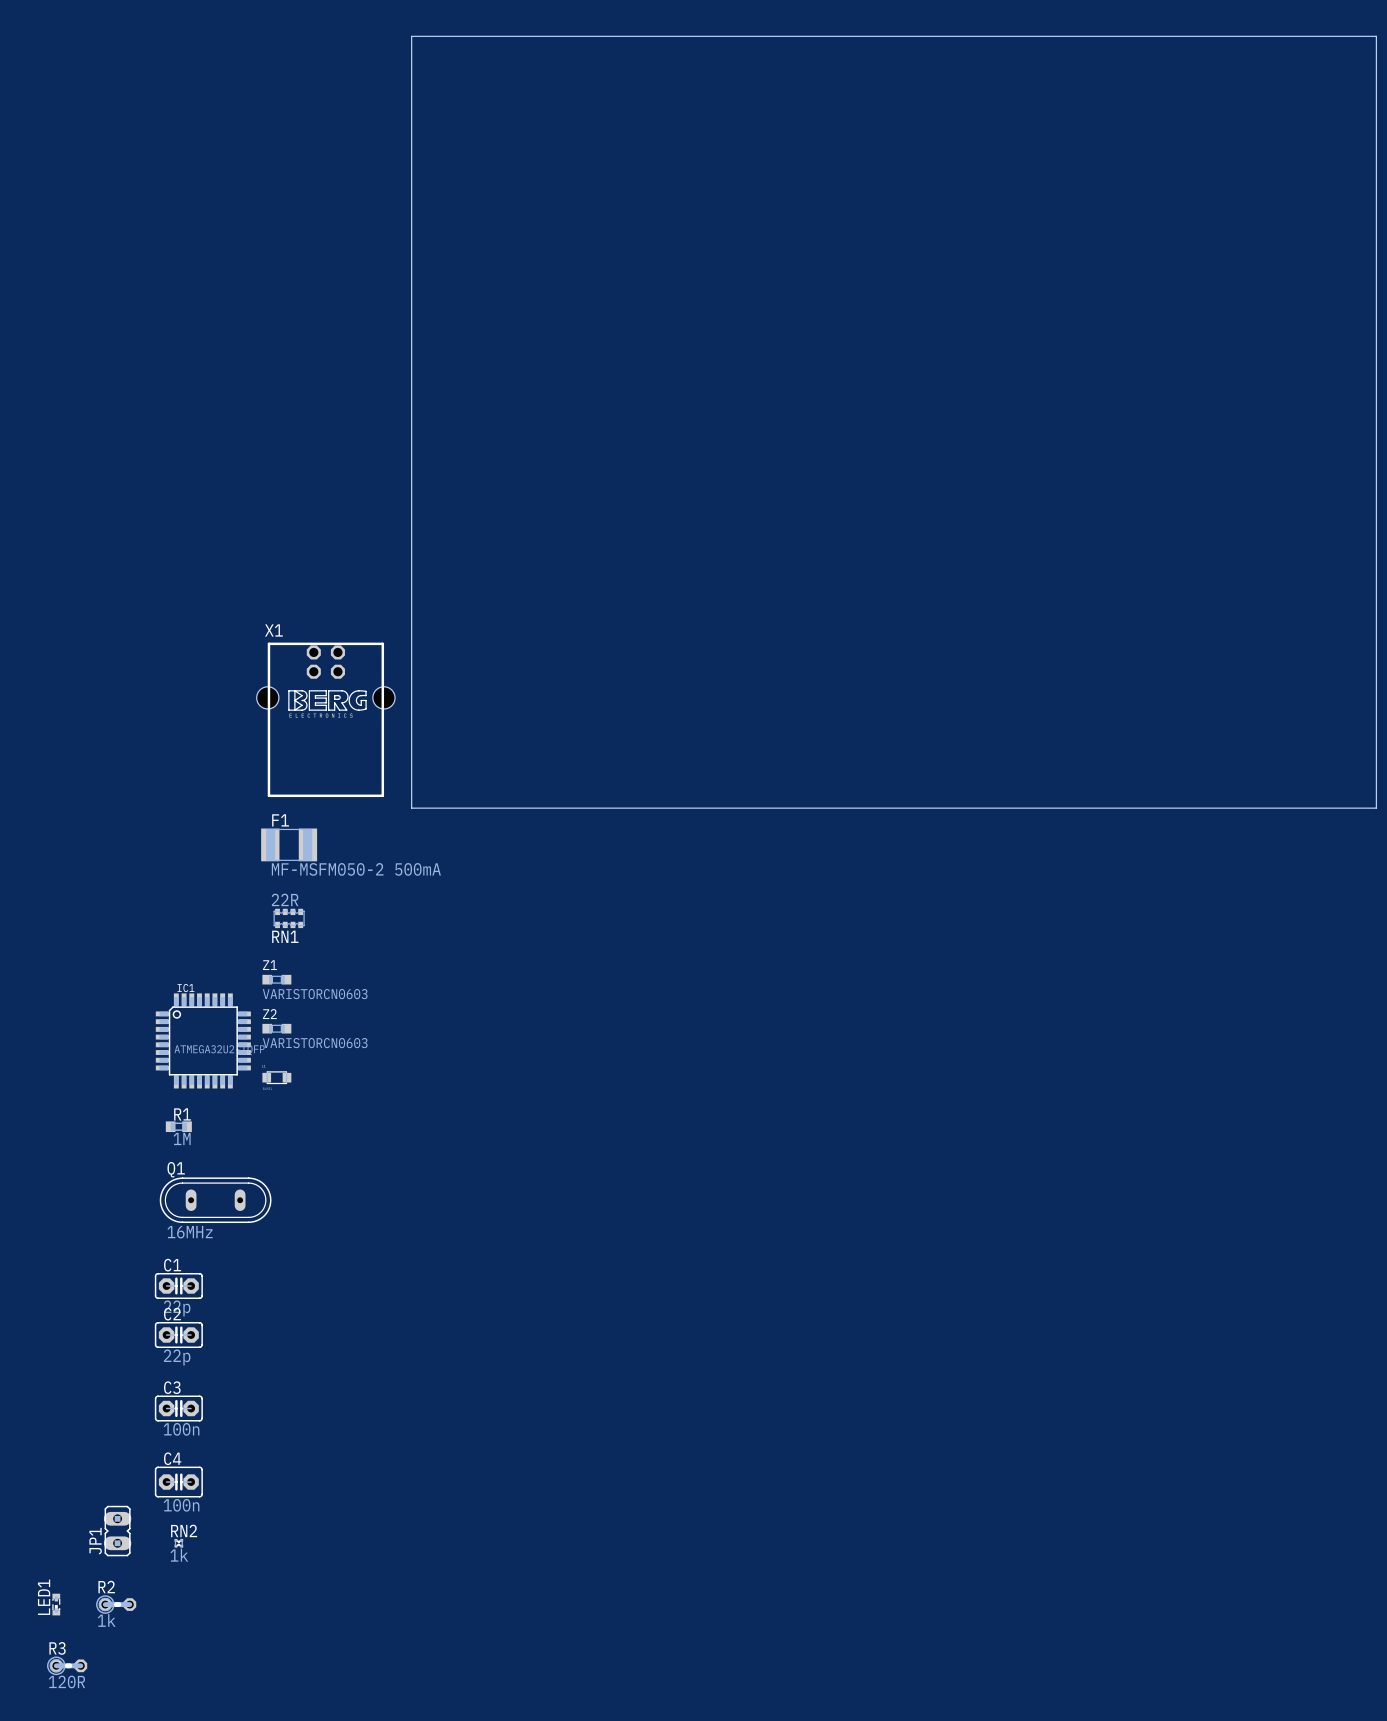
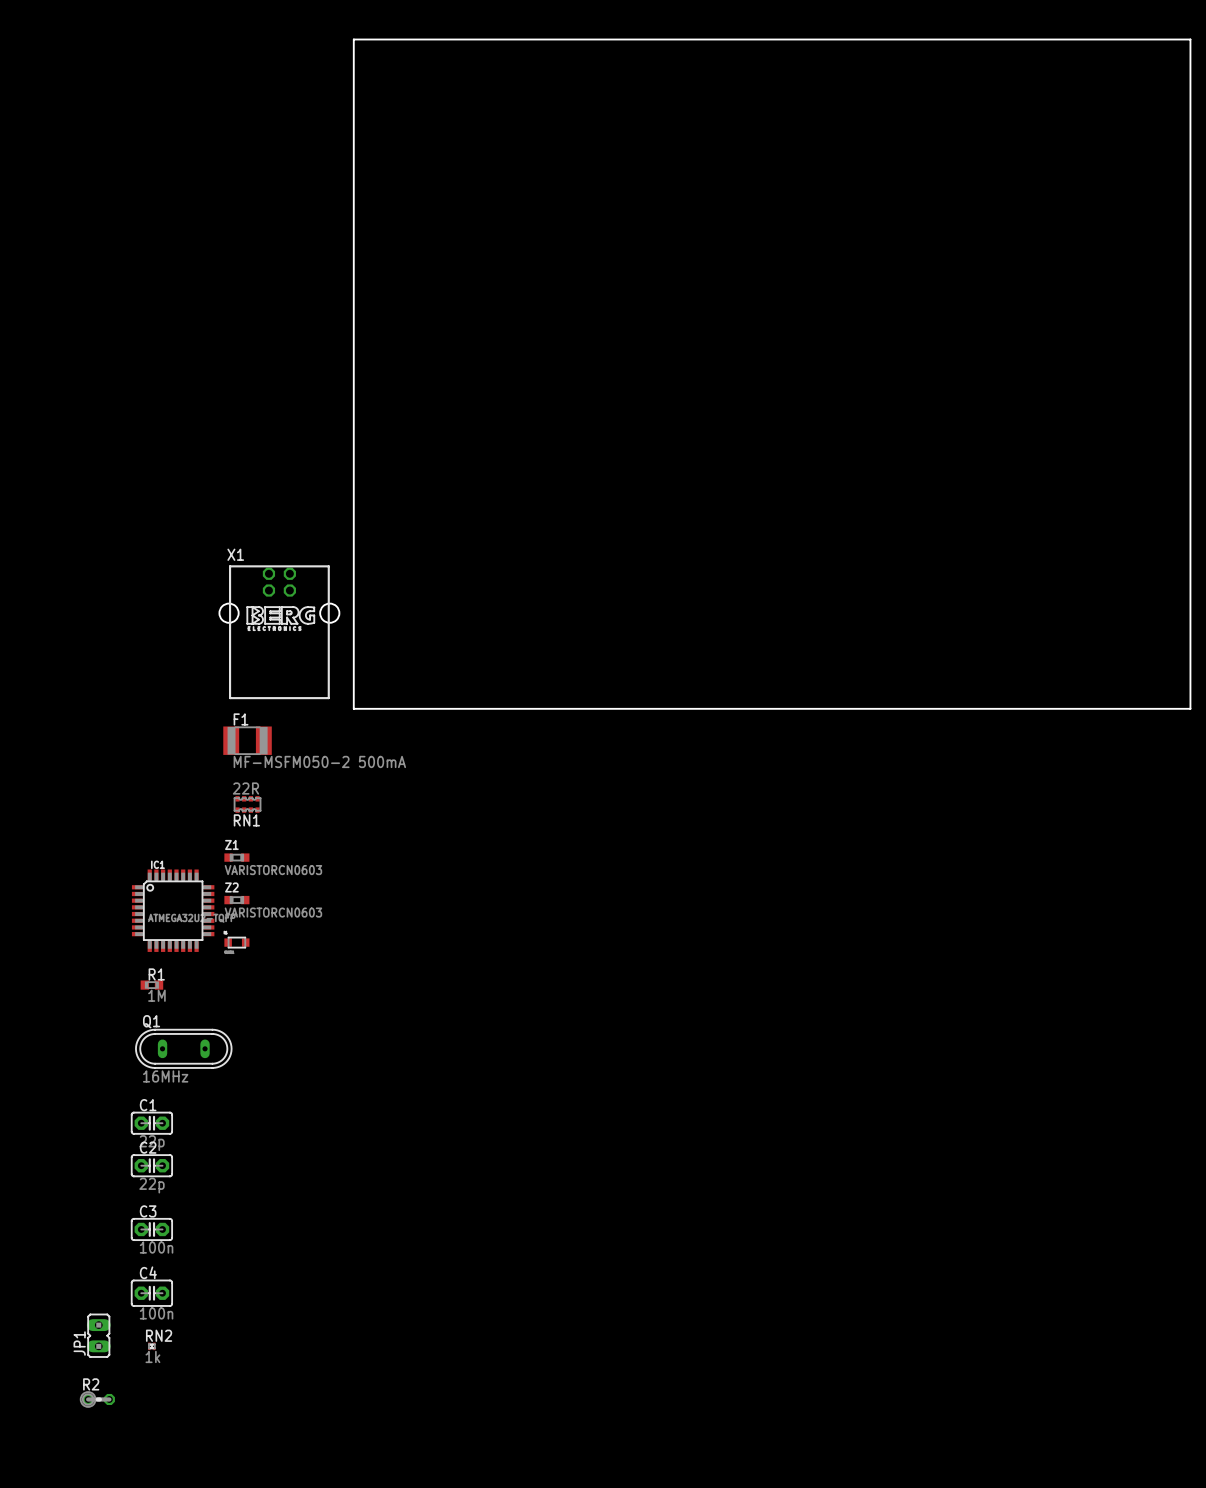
LED1: (56, 1604) -> none
R2 value: 1k (106, 1620) -> none
R3: 120R (67, 1665) -> none

